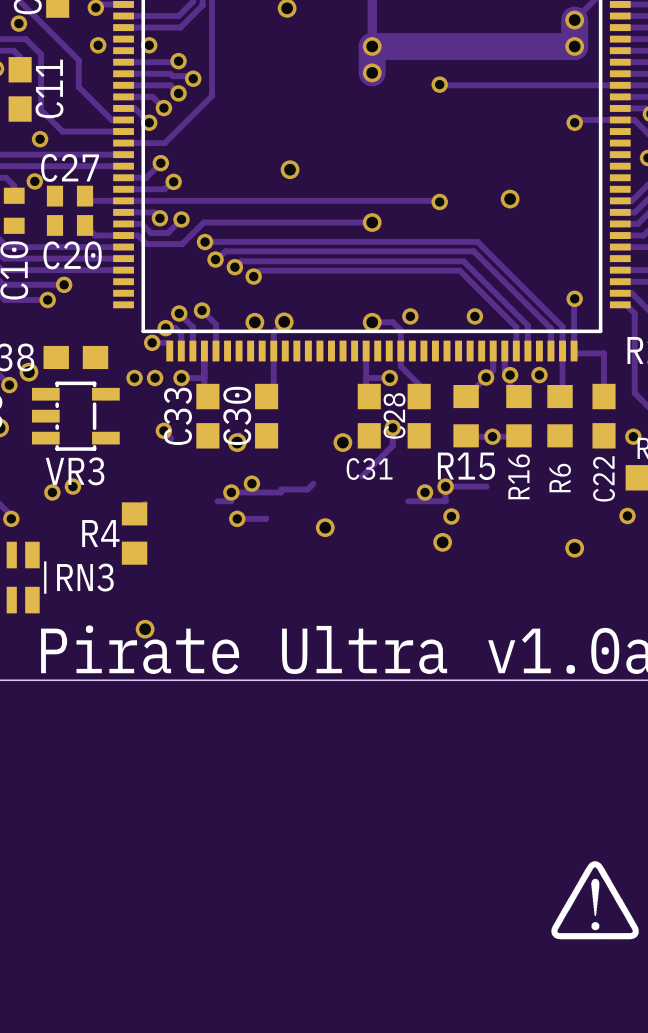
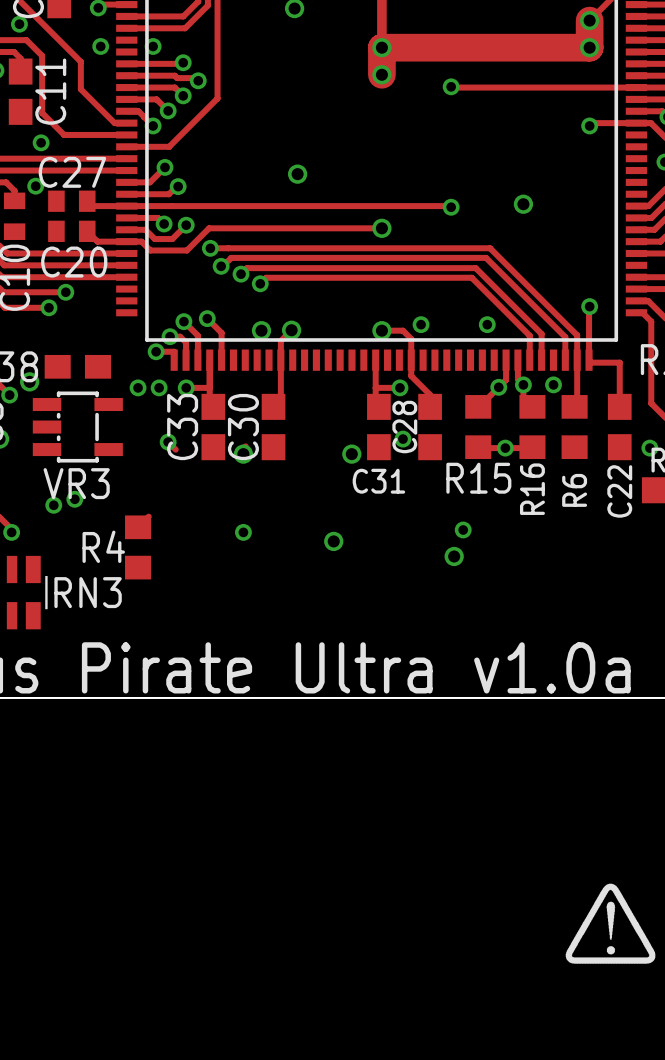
track: (392, 427) (392, 445) (362, 476) -> none
via: (251, 483) -> none
track: (313, 483) (307, 489) (281, 489) (281, 492) (231, 492) (231, 501) (217, 501) -> none
via: (445, 486) -> none
track: (486, 486) (445, 486) (445, 501) (408, 501) -> none
via: (231, 492) -> none
via: (425, 492) -> none
via: (627, 515) -> none
track: (237, 518) (265, 518) -> none
via: (574, 548) -> none
via: (145, 629) -> none

